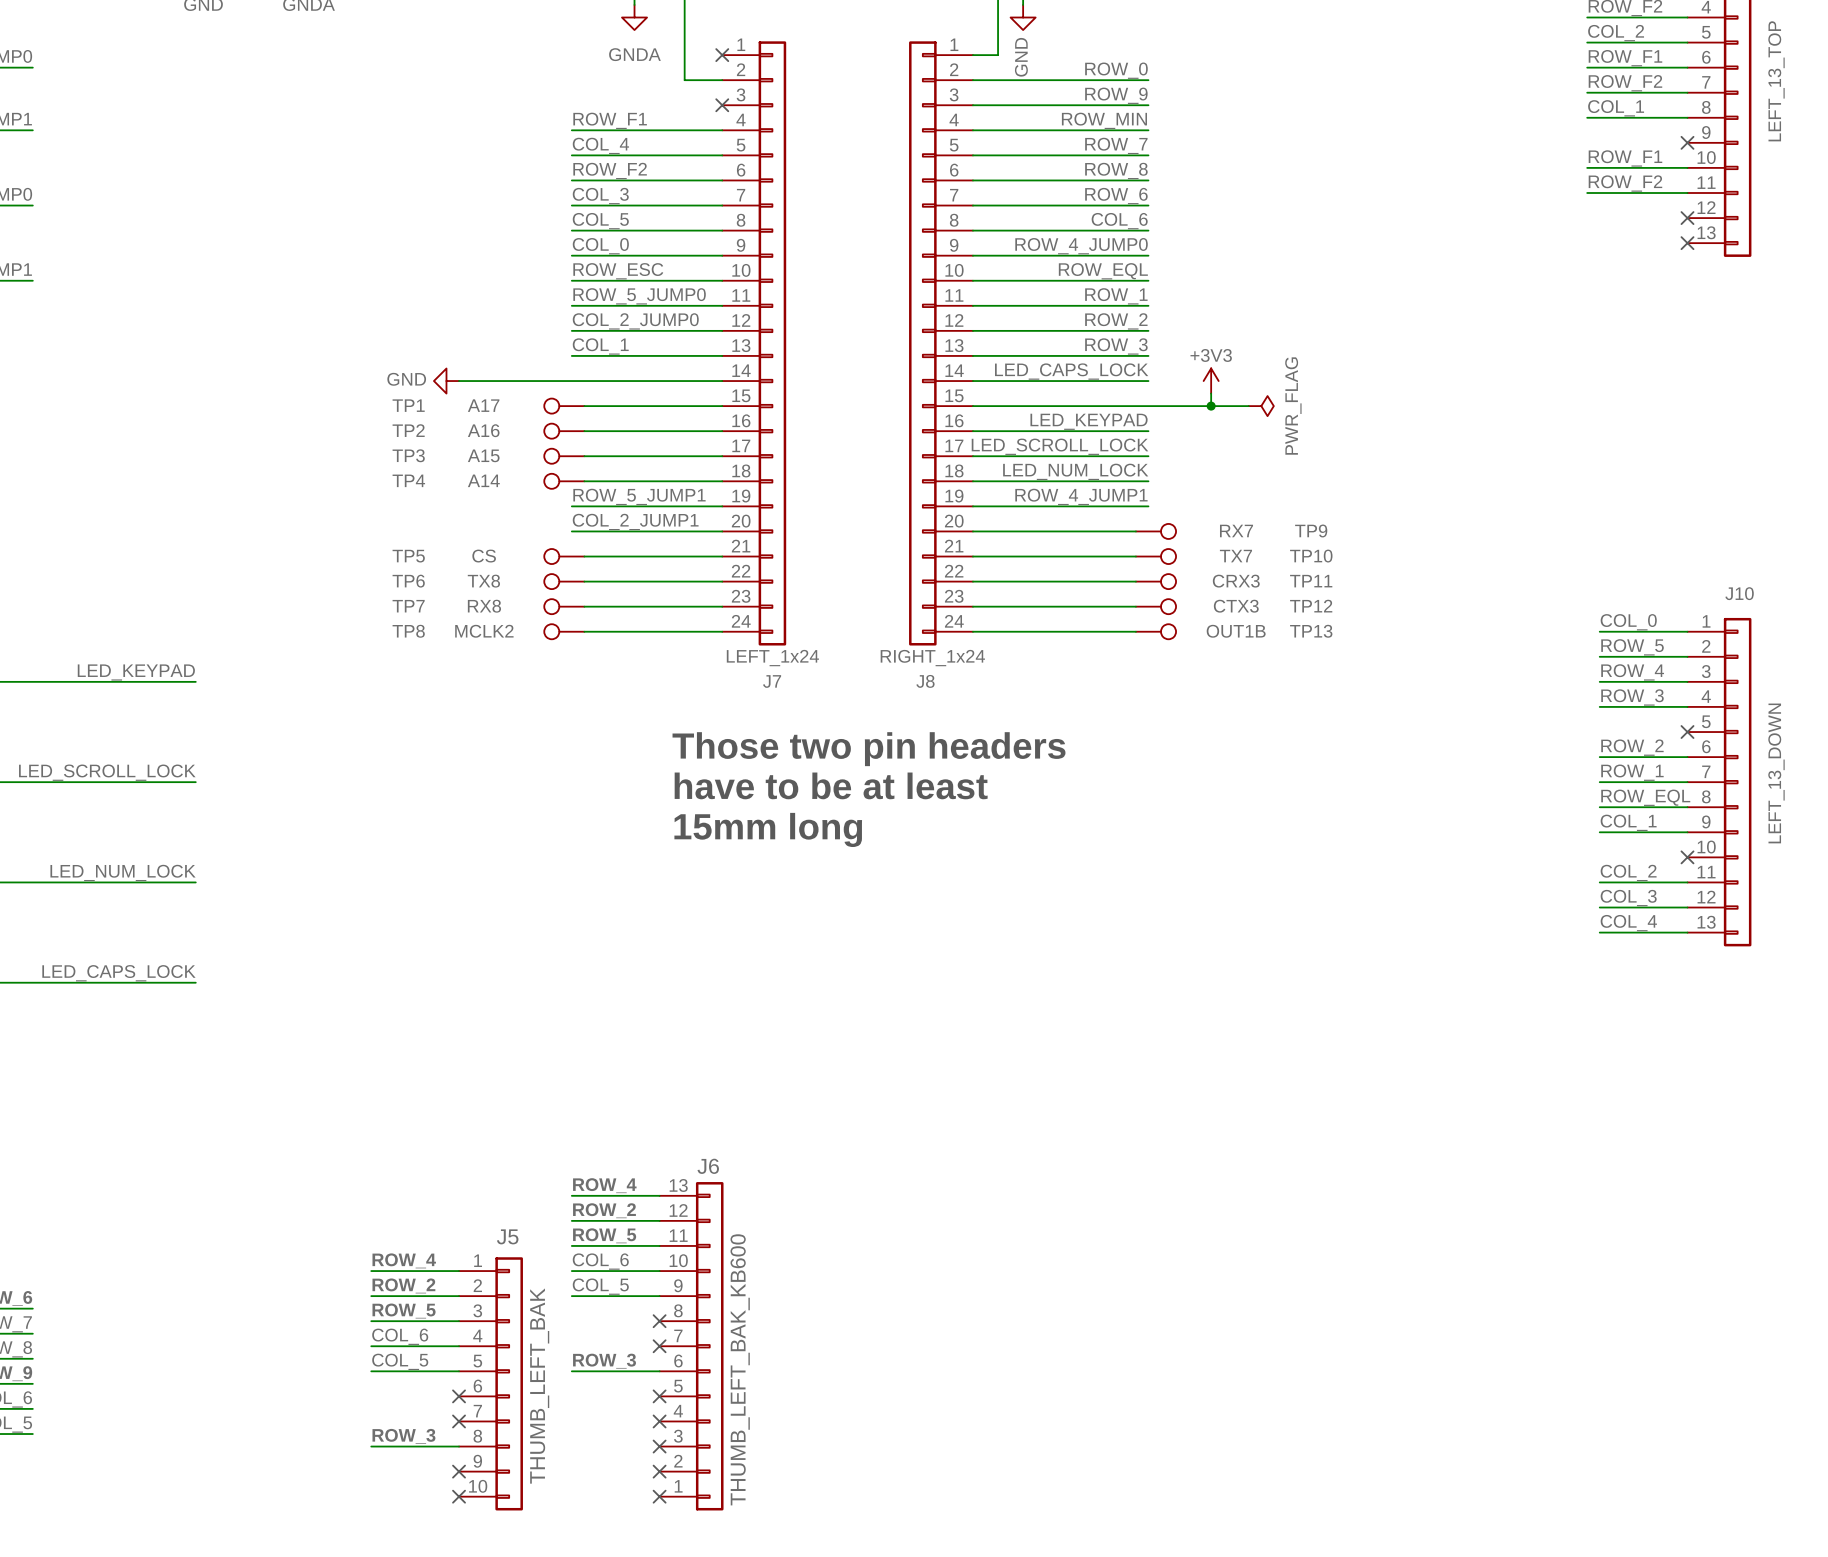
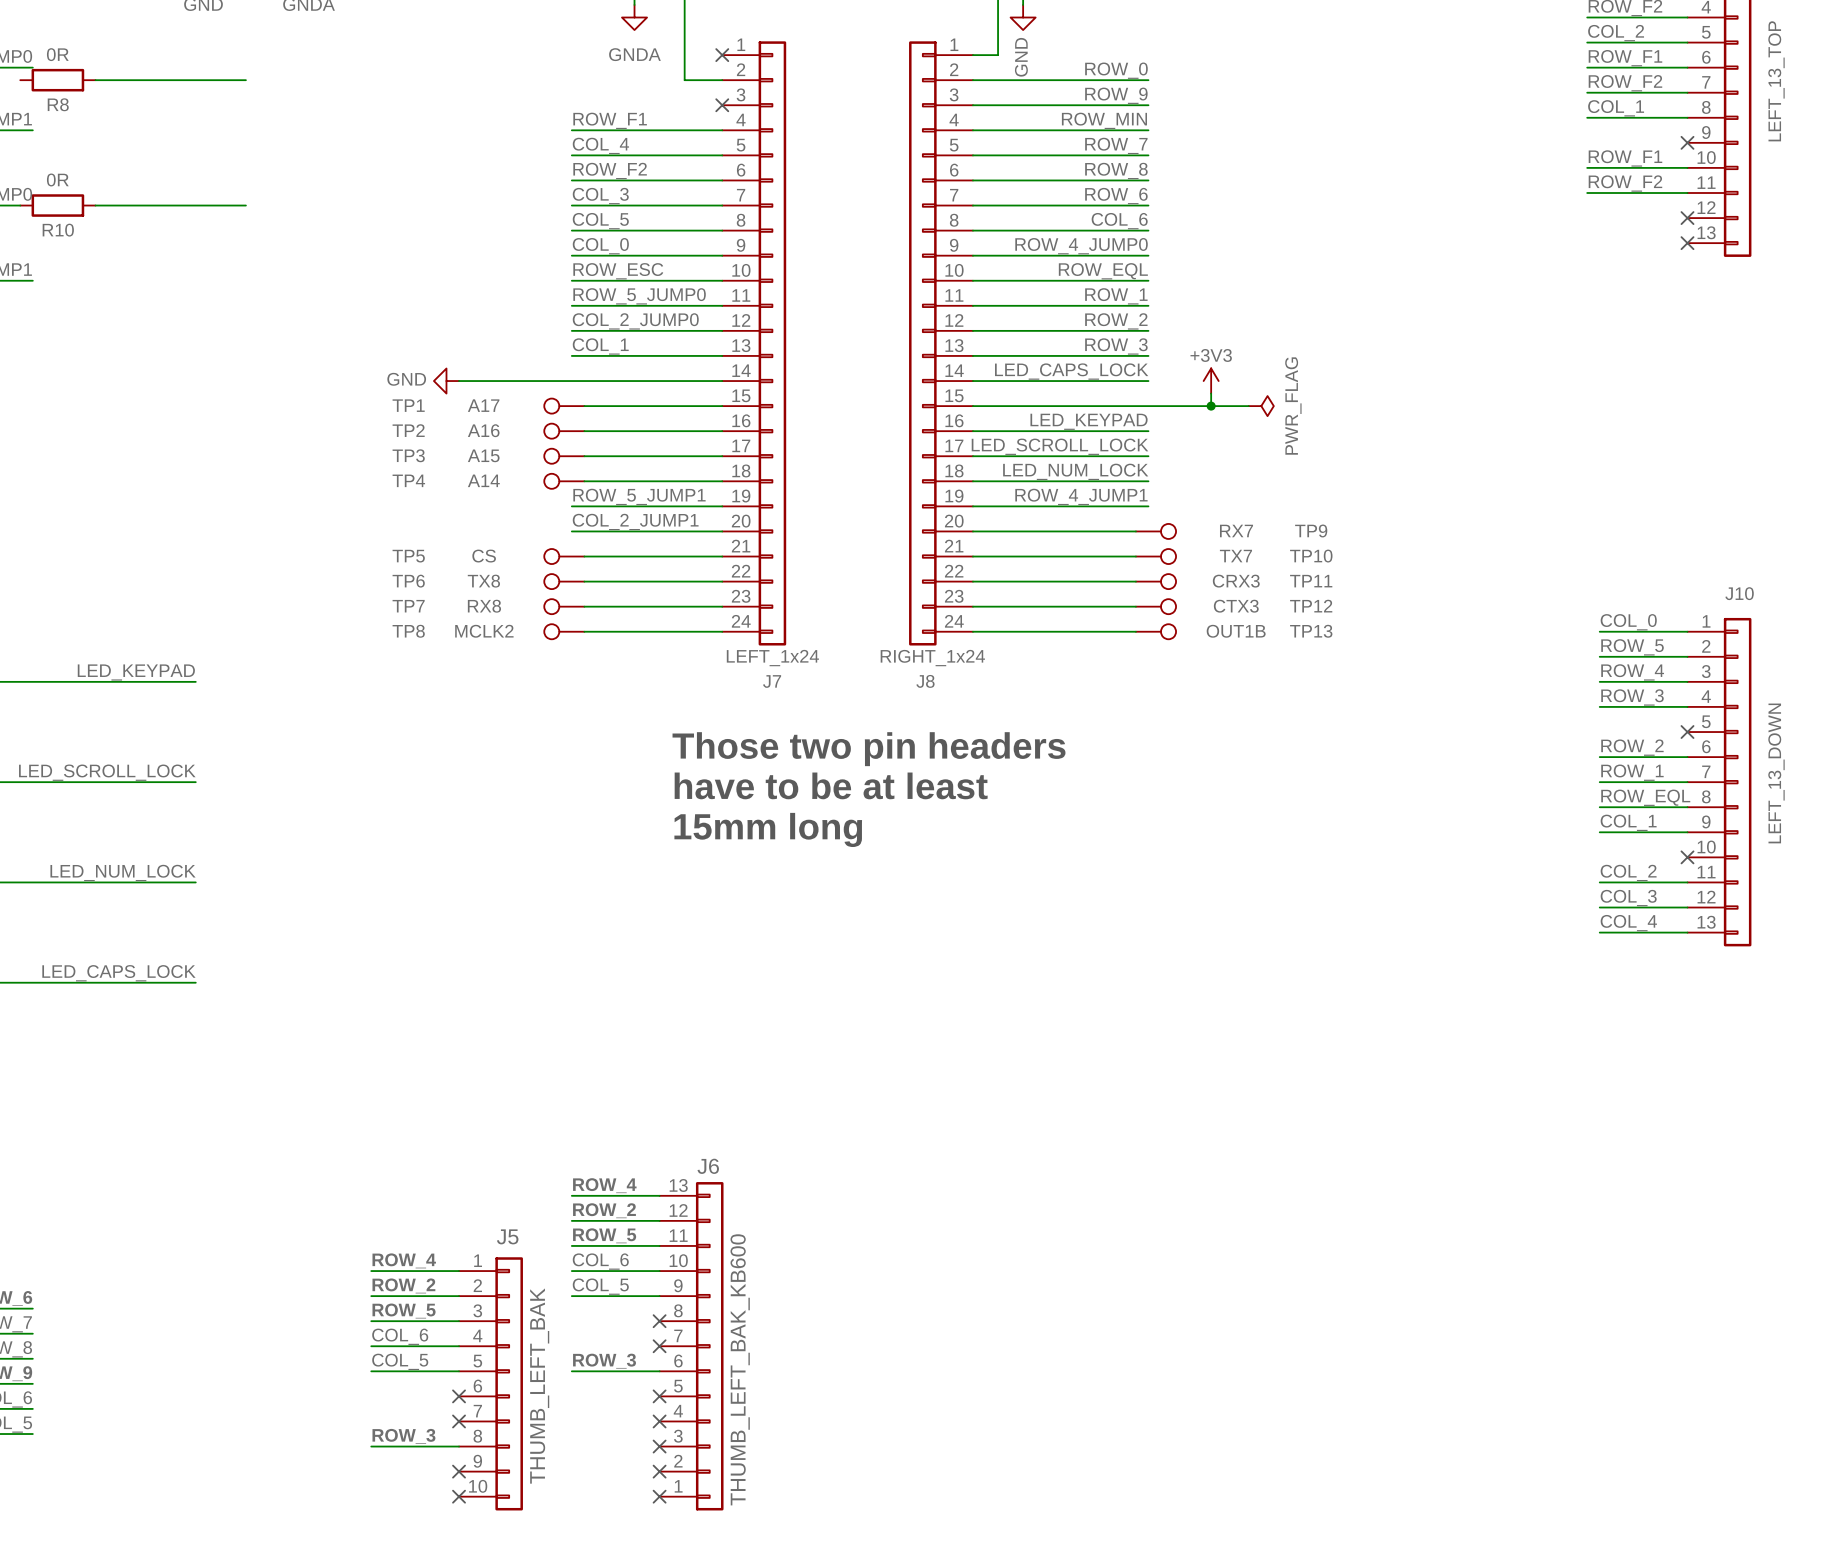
R8: none -> 0R (57, 80)
wire: none -> (95, 80) (245, 80)
R10: none -> 0R (57, 205)
wire: none -> (95, 205) (245, 205)

